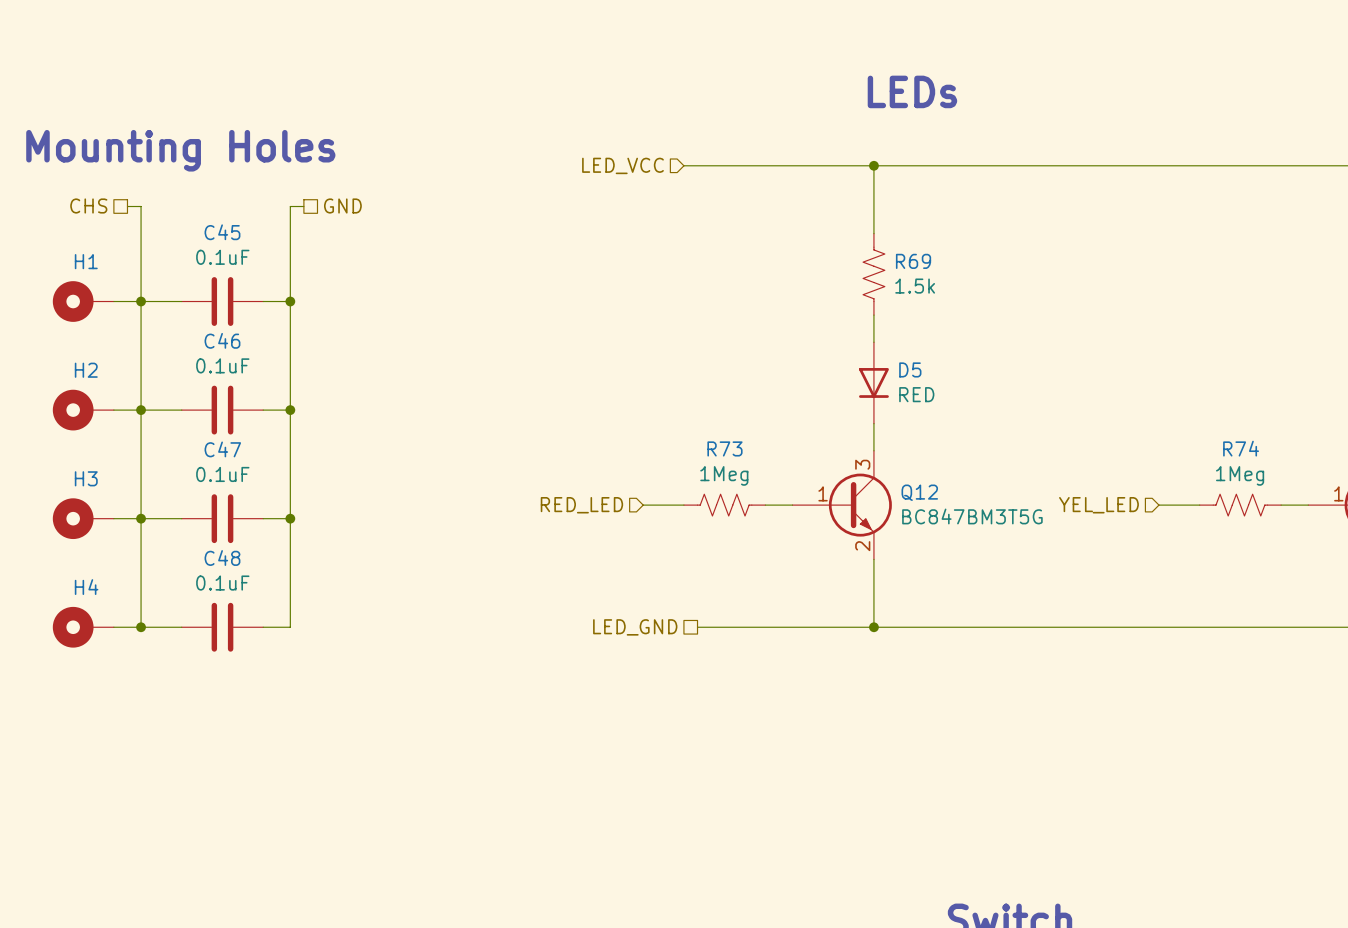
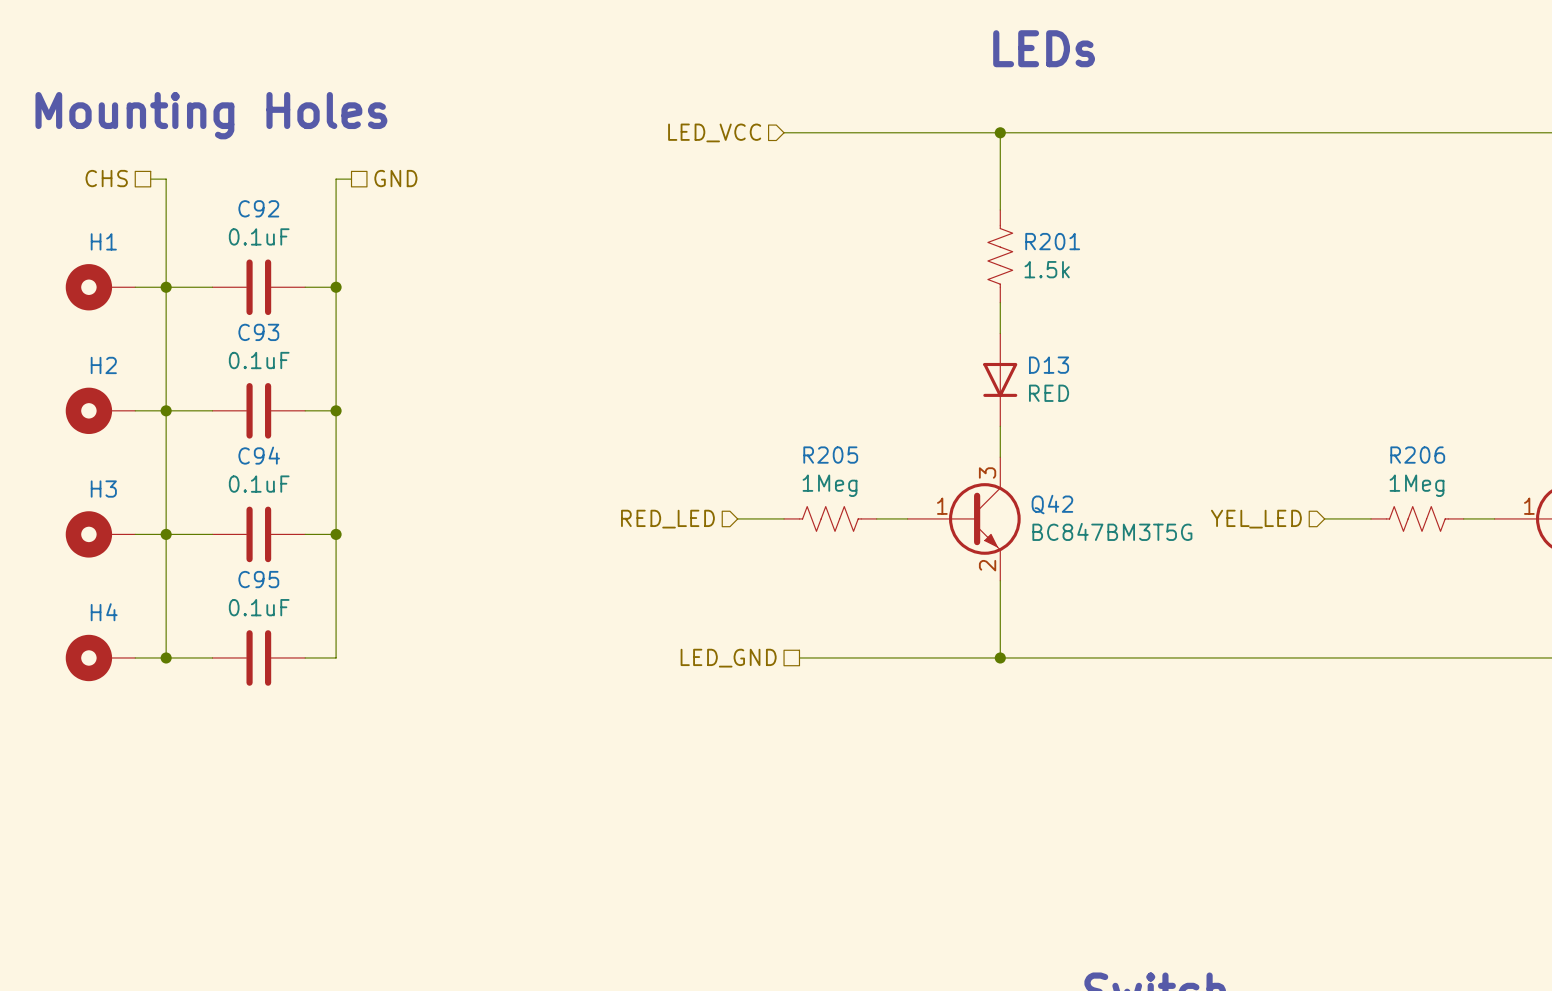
C45 name: C45 (222, 232) -> C92 (258, 208)
R69 name: R69 (913, 261) -> R201 (1052, 241)
C46 name: C46 (222, 340) -> C93 (258, 332)
D5 name: D5 (910, 369) -> D13 (1049, 365)
R73 name: R73 (724, 448) -> R205 (830, 455)
R74 name: R74 (1241, 448) -> R206 (1417, 455)
C47 name: C47 (222, 449) -> C94 (259, 455)
Q12 name: Q12 (919, 492) -> Q42 (1052, 504)
C48 name: C48 (222, 558) -> C95 (258, 579)

